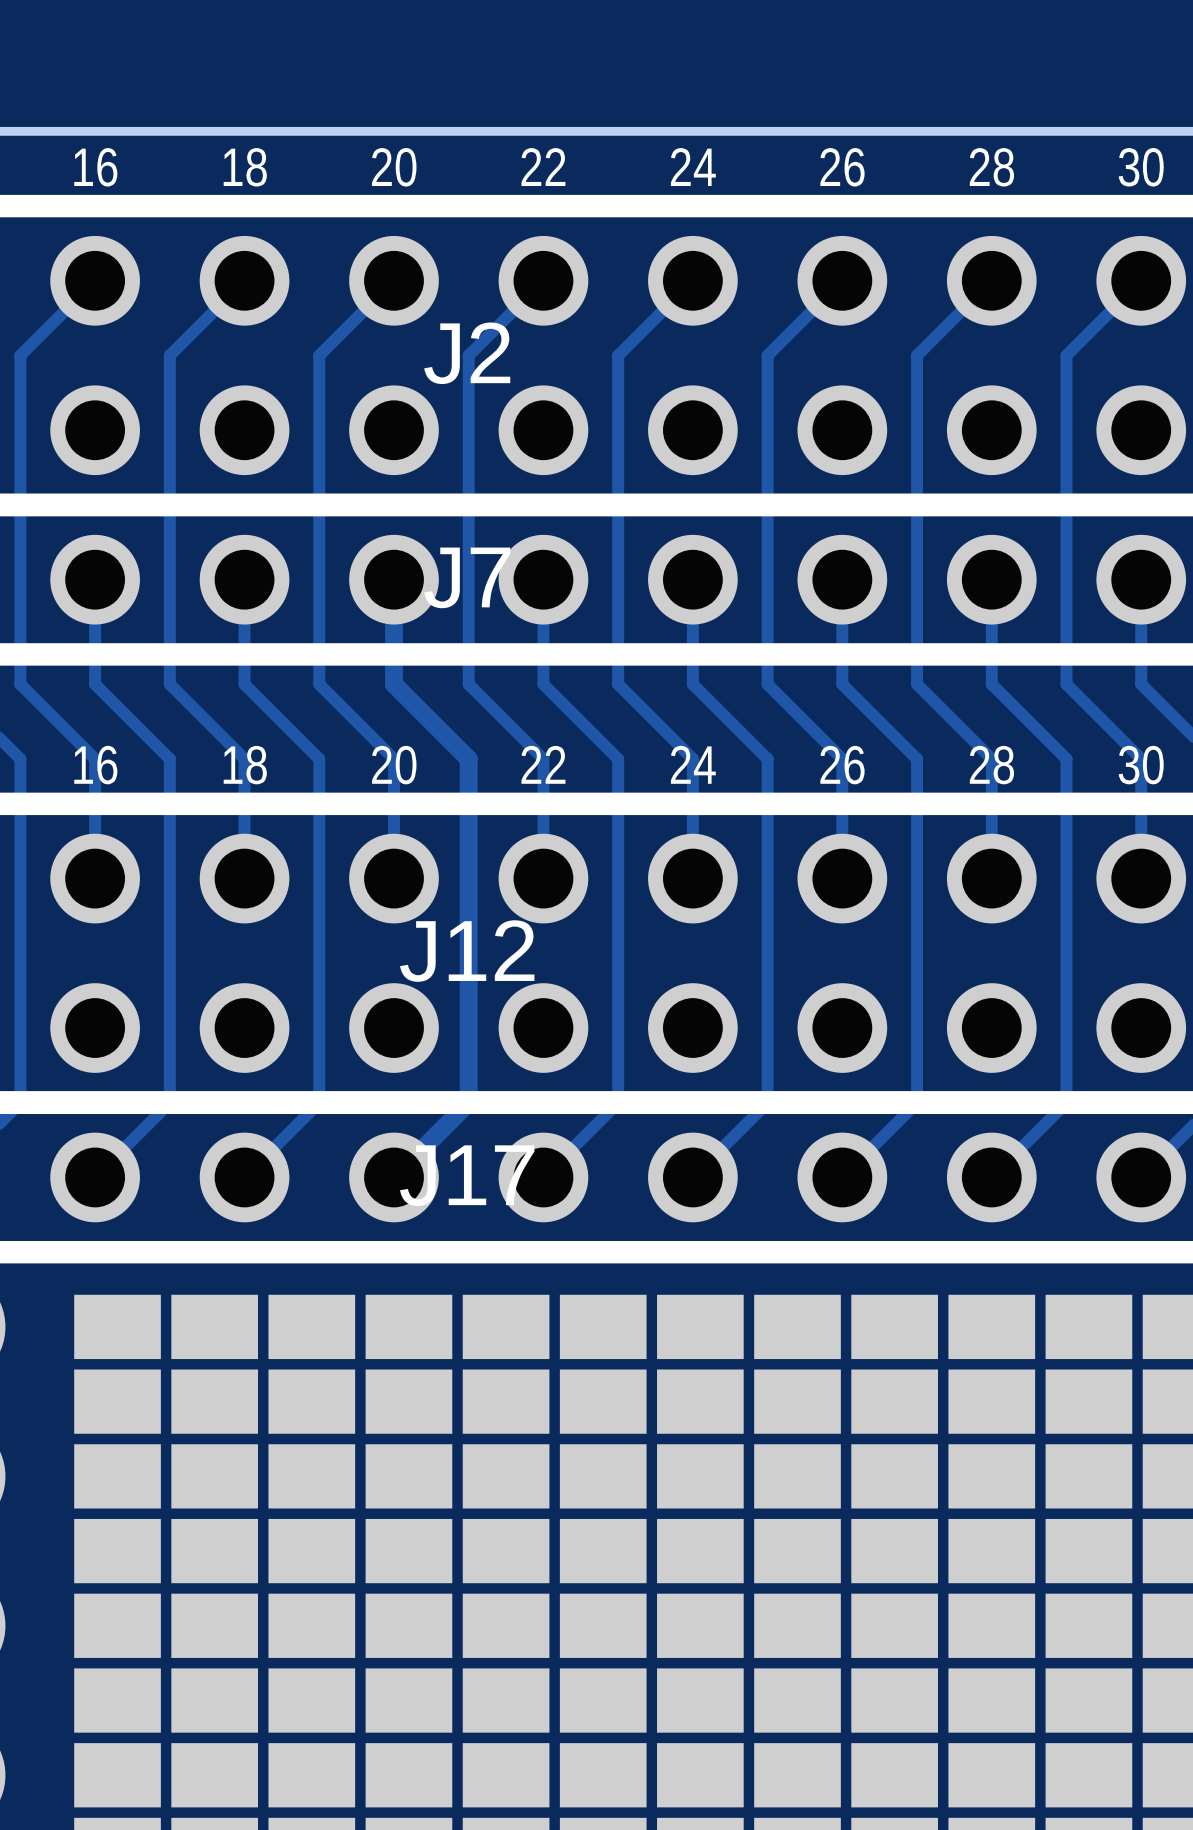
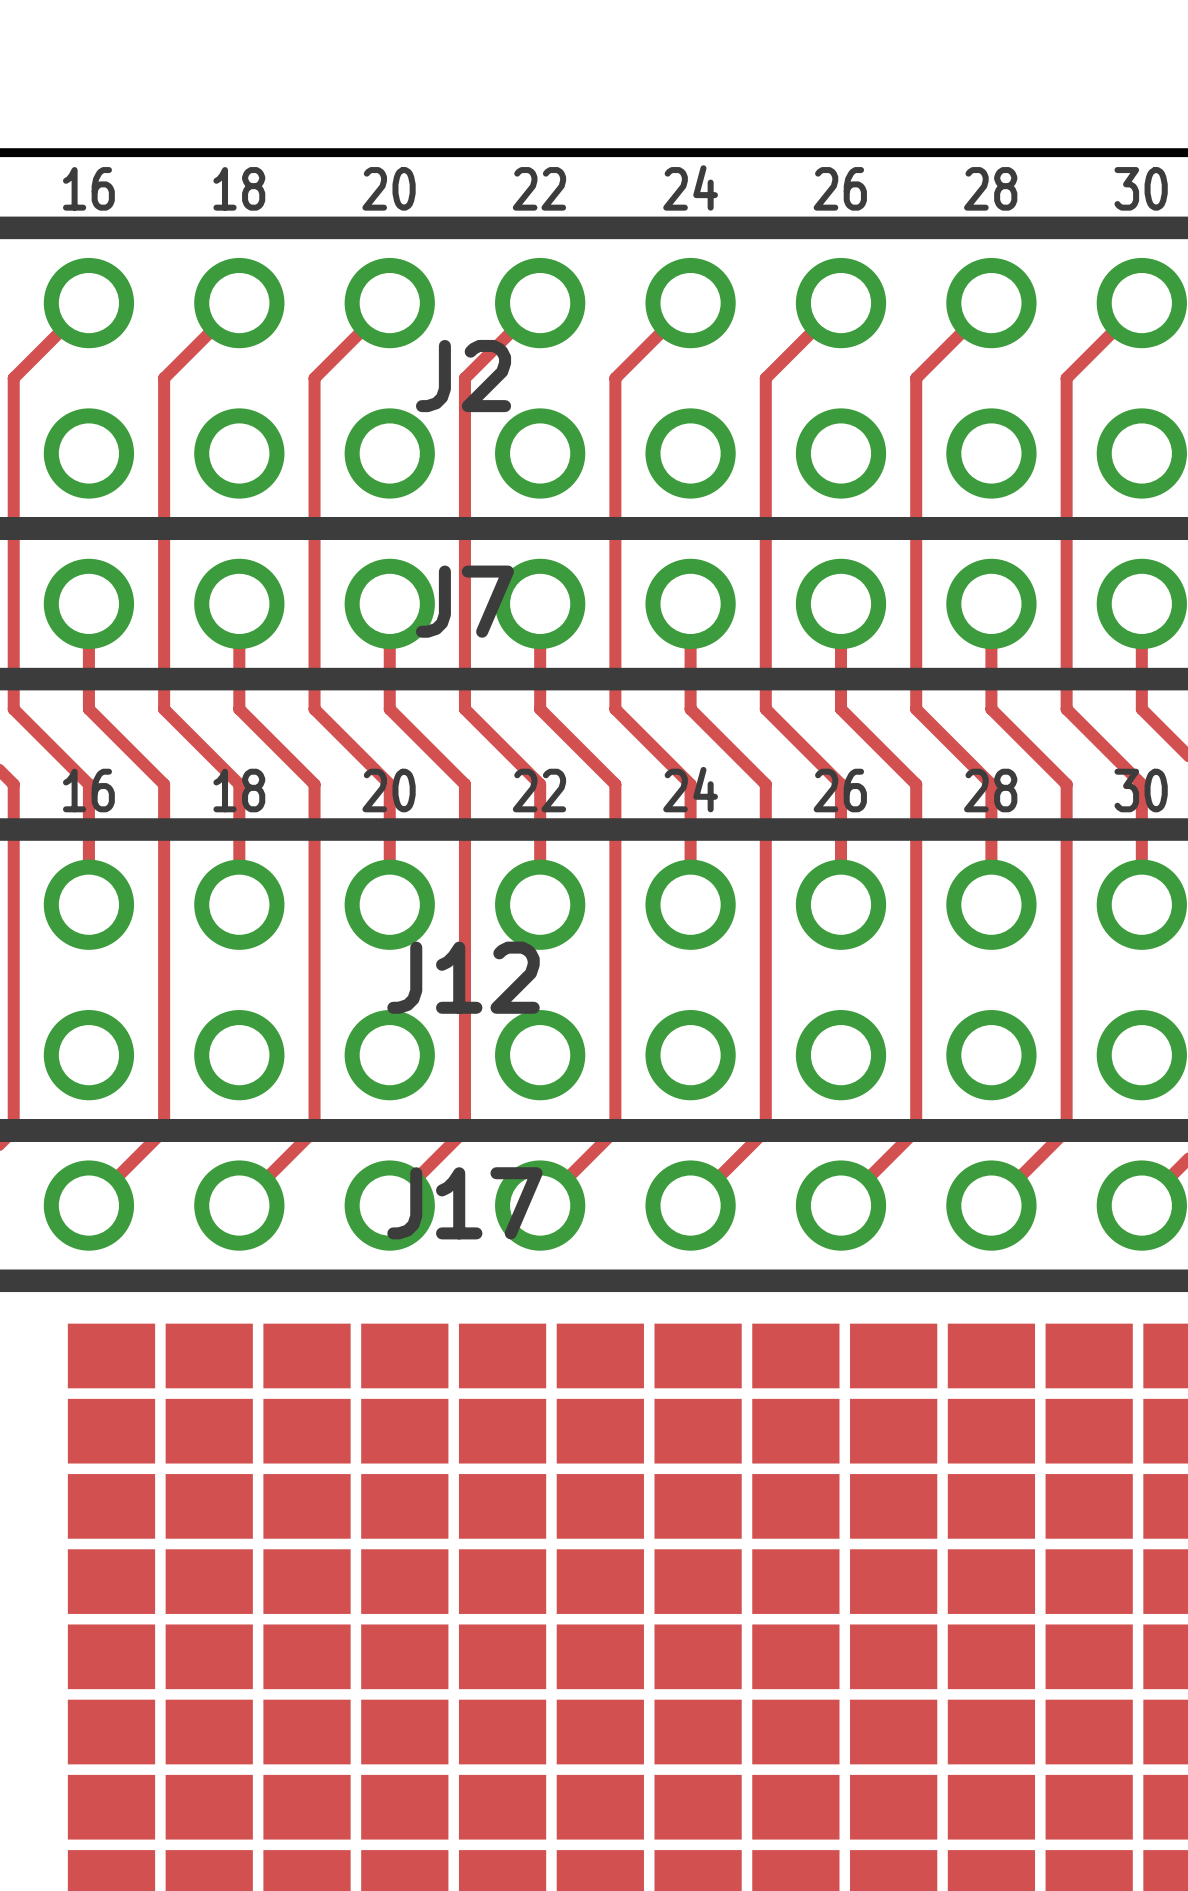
track width: thick (394, 579) (394, 684) (468, 759) (468, 1102) (394, 1177) -> thin (389, 603) (389, 709) (464, 784) (464, 1130) (389, 1205)

